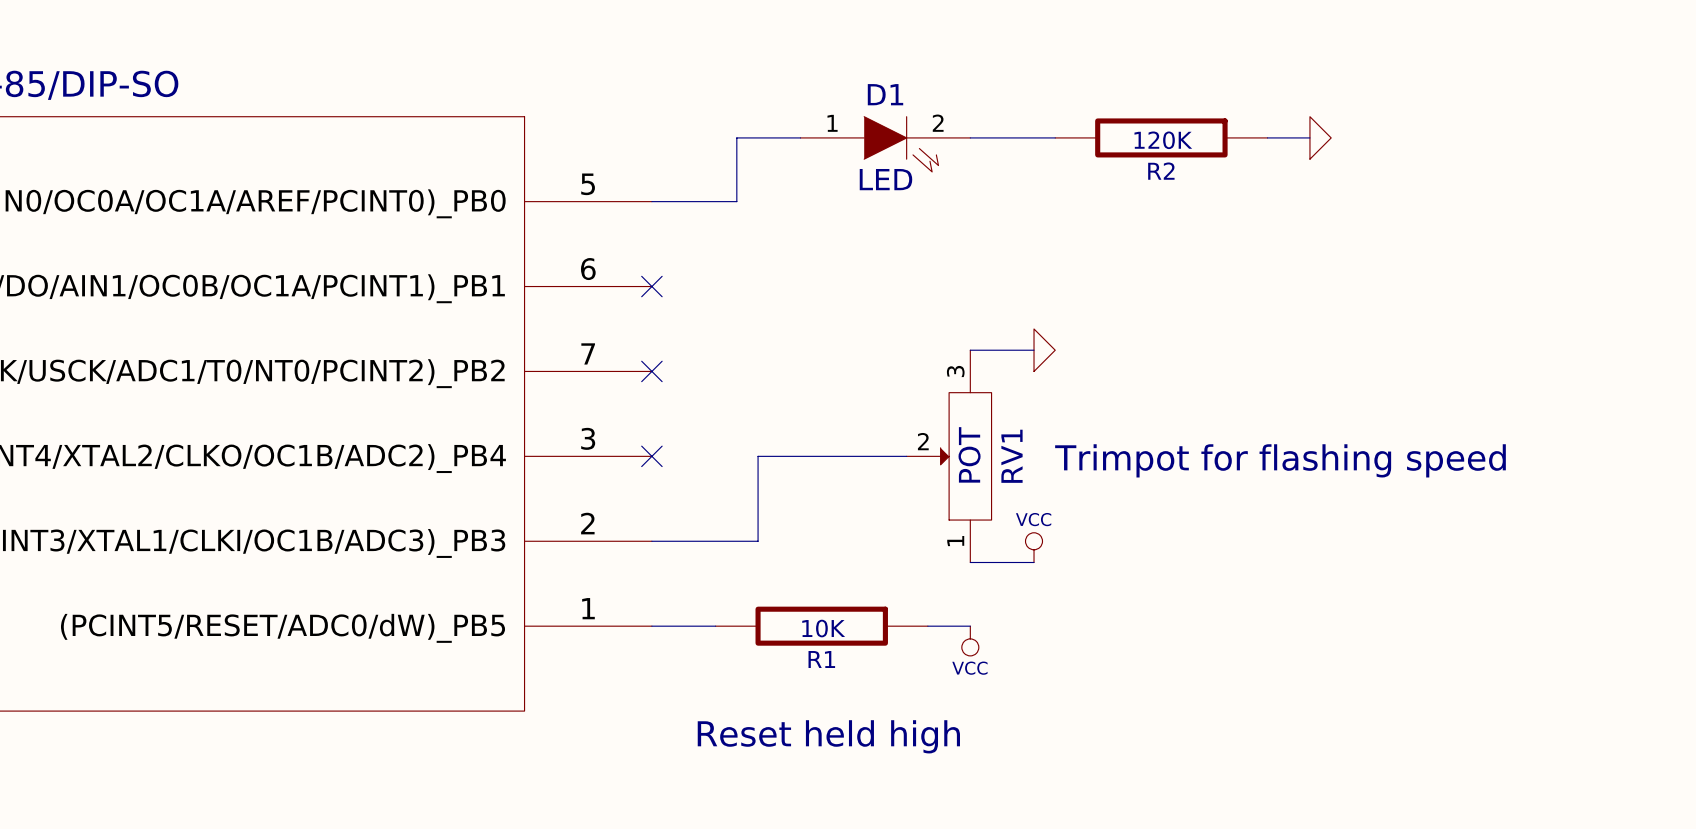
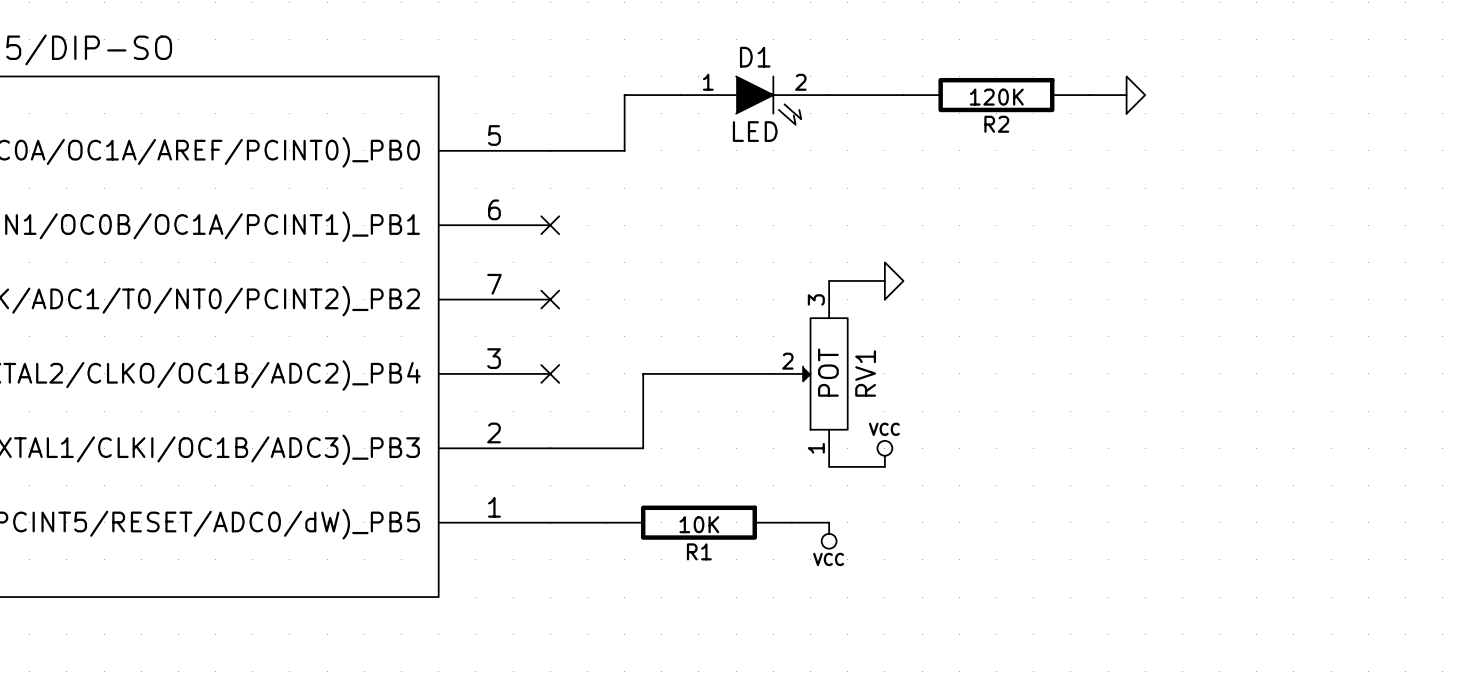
text: Trimpot for flashing speed (1280, 460) -> none
text: Reset held high (828, 736) -> none

